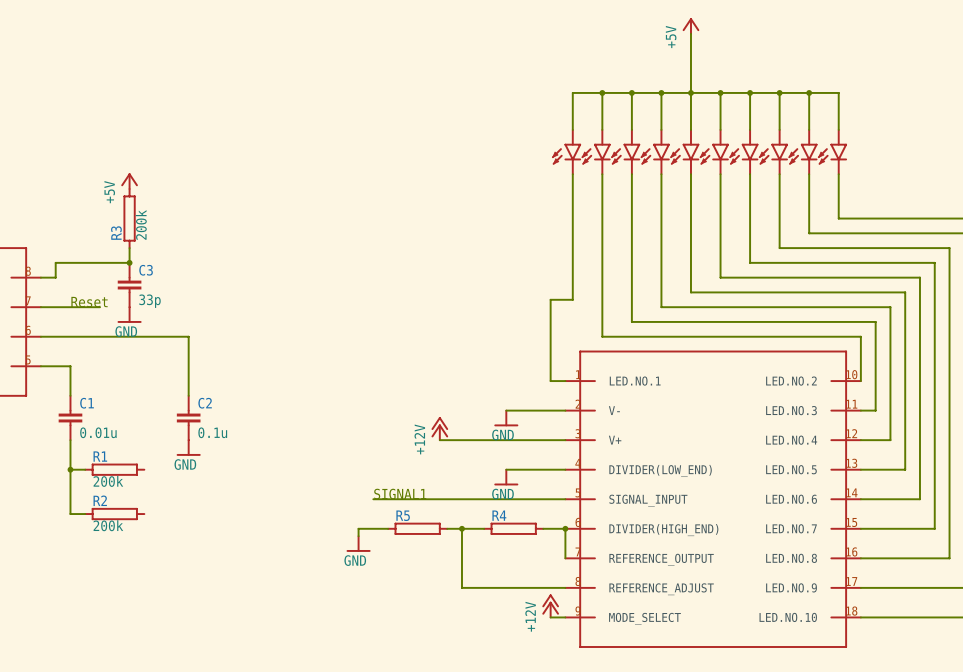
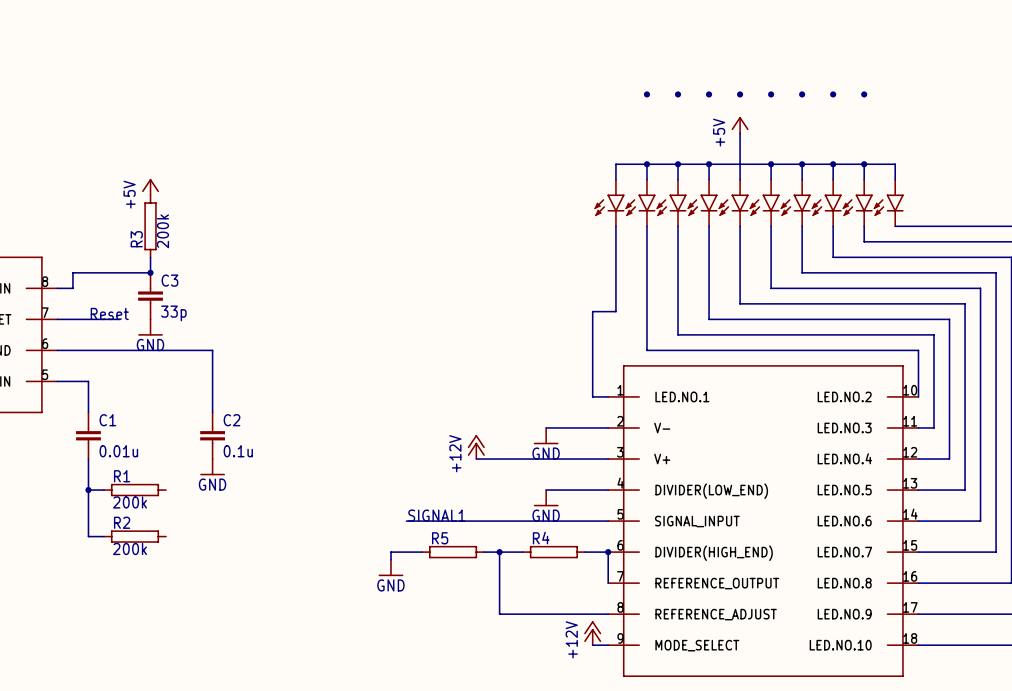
power symbol position: +5V (690, 26) -> +5V (740, 125)
wire: (690, 33) (690, 129) -> none
wire: (602, 92) (602, 129) -> none
wire: (631, 92) (631, 129) -> none
wire: (661, 92) (661, 129) -> none
wire: (720, 92) (720, 129) -> none
wire: (750, 92) (750, 129) -> none
wire: (779, 92) (779, 129) -> none
wire: (809, 92) (809, 129) -> none
wire: (572, 129) (572, 92) (838, 92) (838, 129) -> none
part position: (699, 152) -> (749, 203)
junction: none -> (646, 164)
junction: none -> (678, 164)
junction: none -> (709, 164)
junction: none -> (771, 164)
junction: none -> (802, 164)
junction: none -> (833, 164)
junction: none -> (864, 164)

